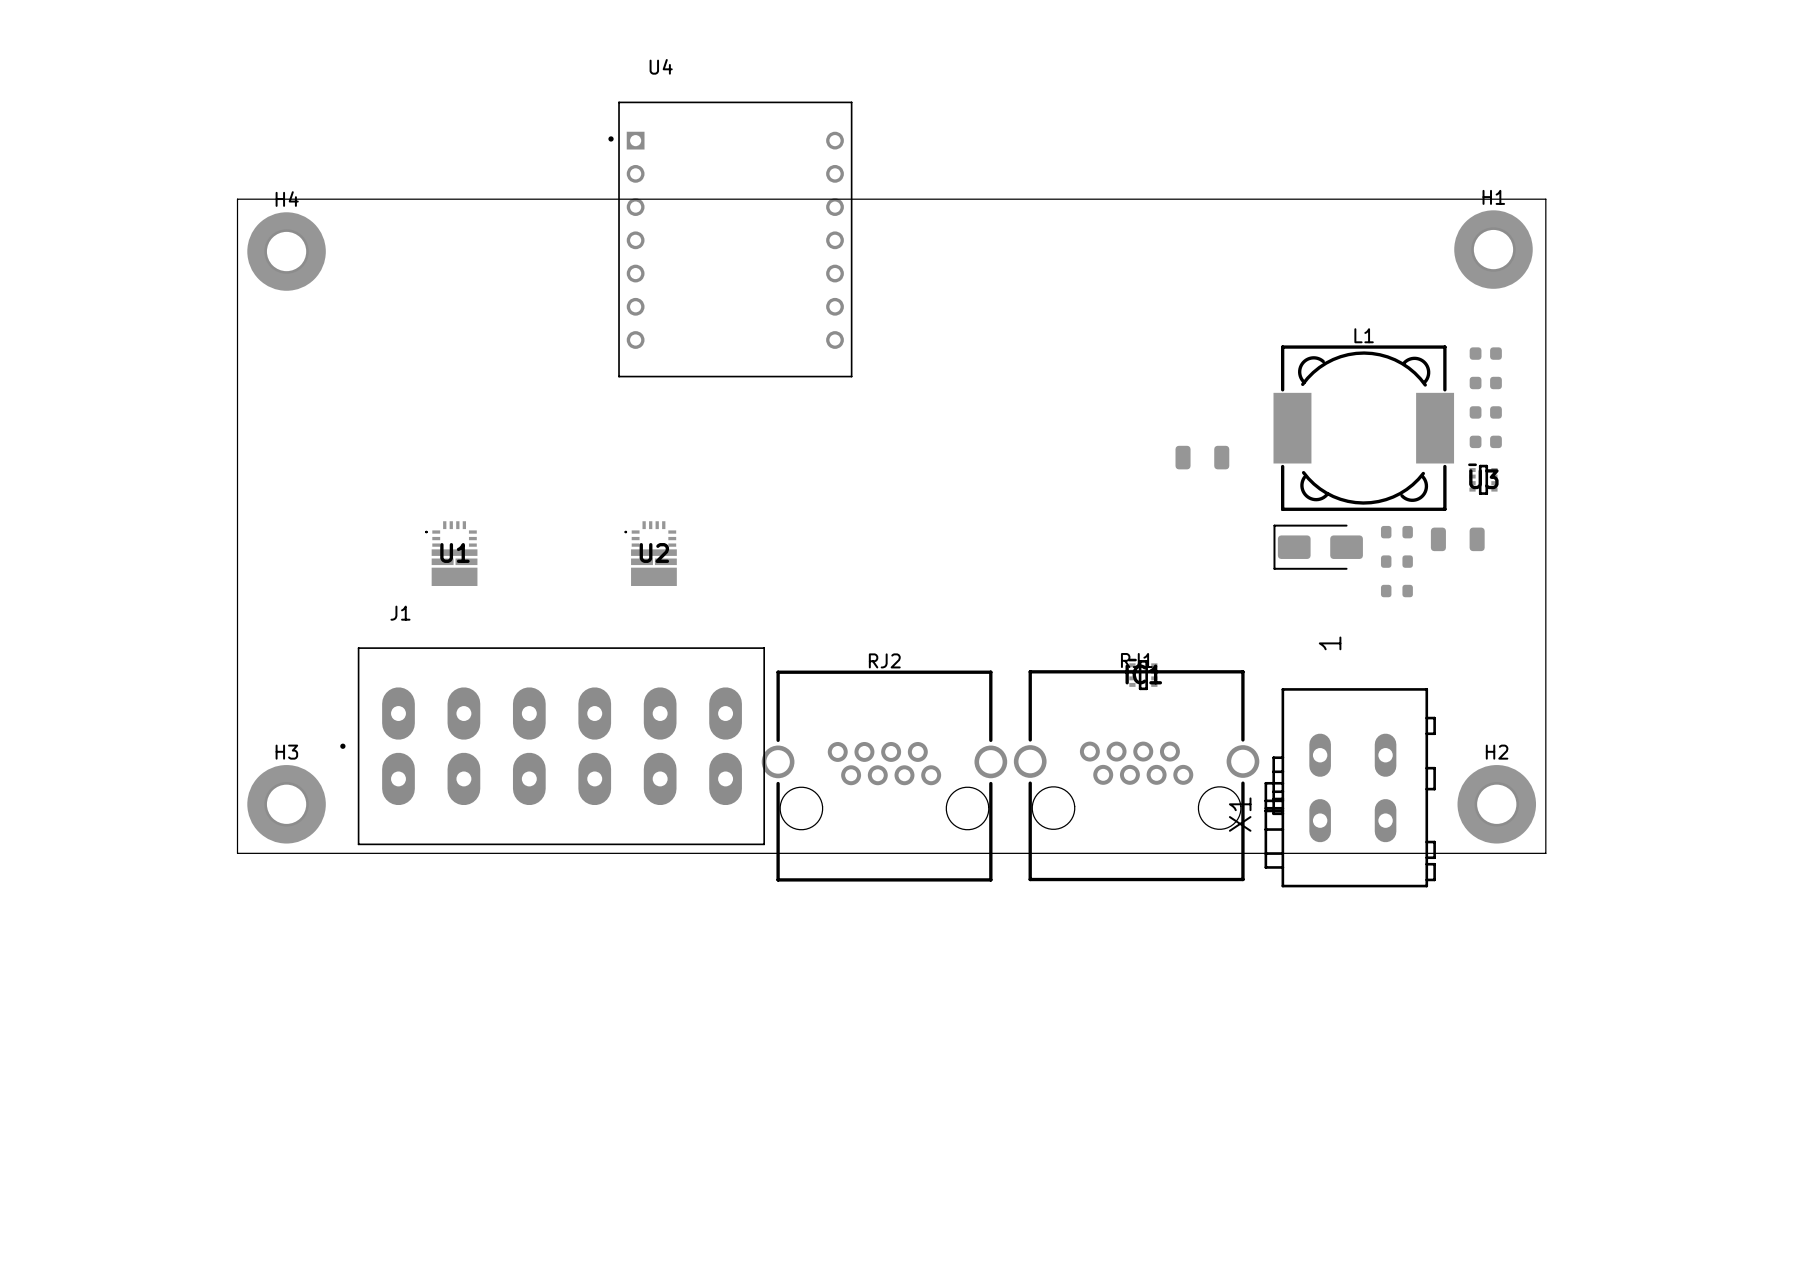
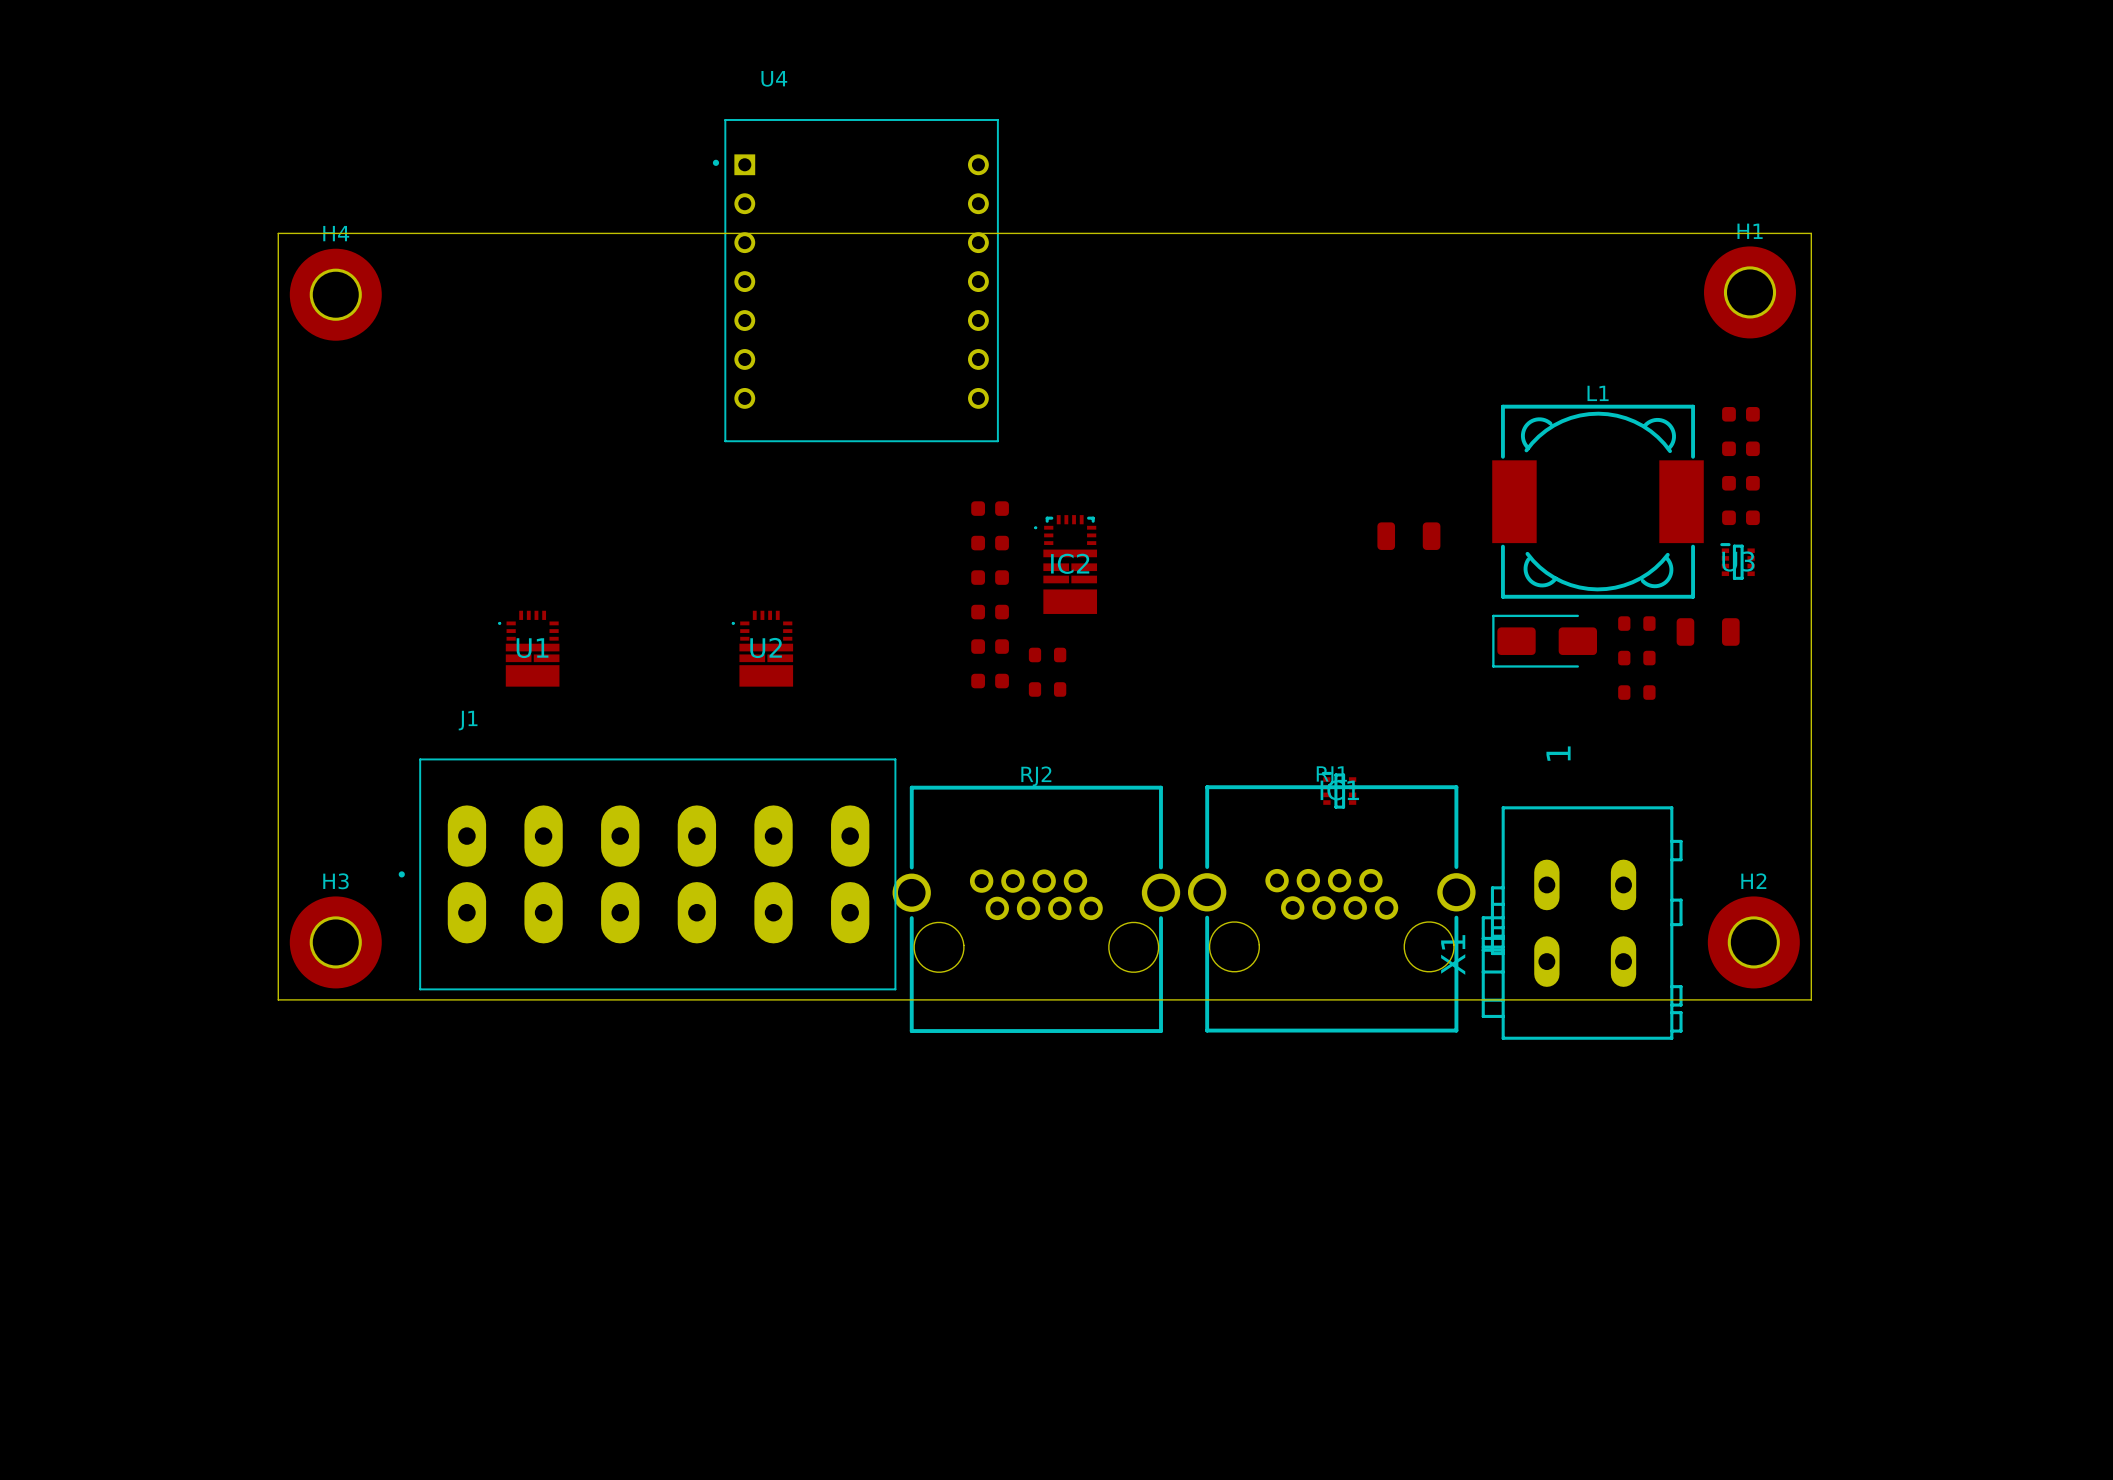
part: none -> (990, 508)
part: none -> (990, 543)
IC2: none -> (1065, 564)
part: none -> (990, 577)
part: none -> (990, 612)
part: none -> (990, 646)
part: none -> (1047, 654)
part: none -> (990, 681)
part: none -> (1047, 689)

